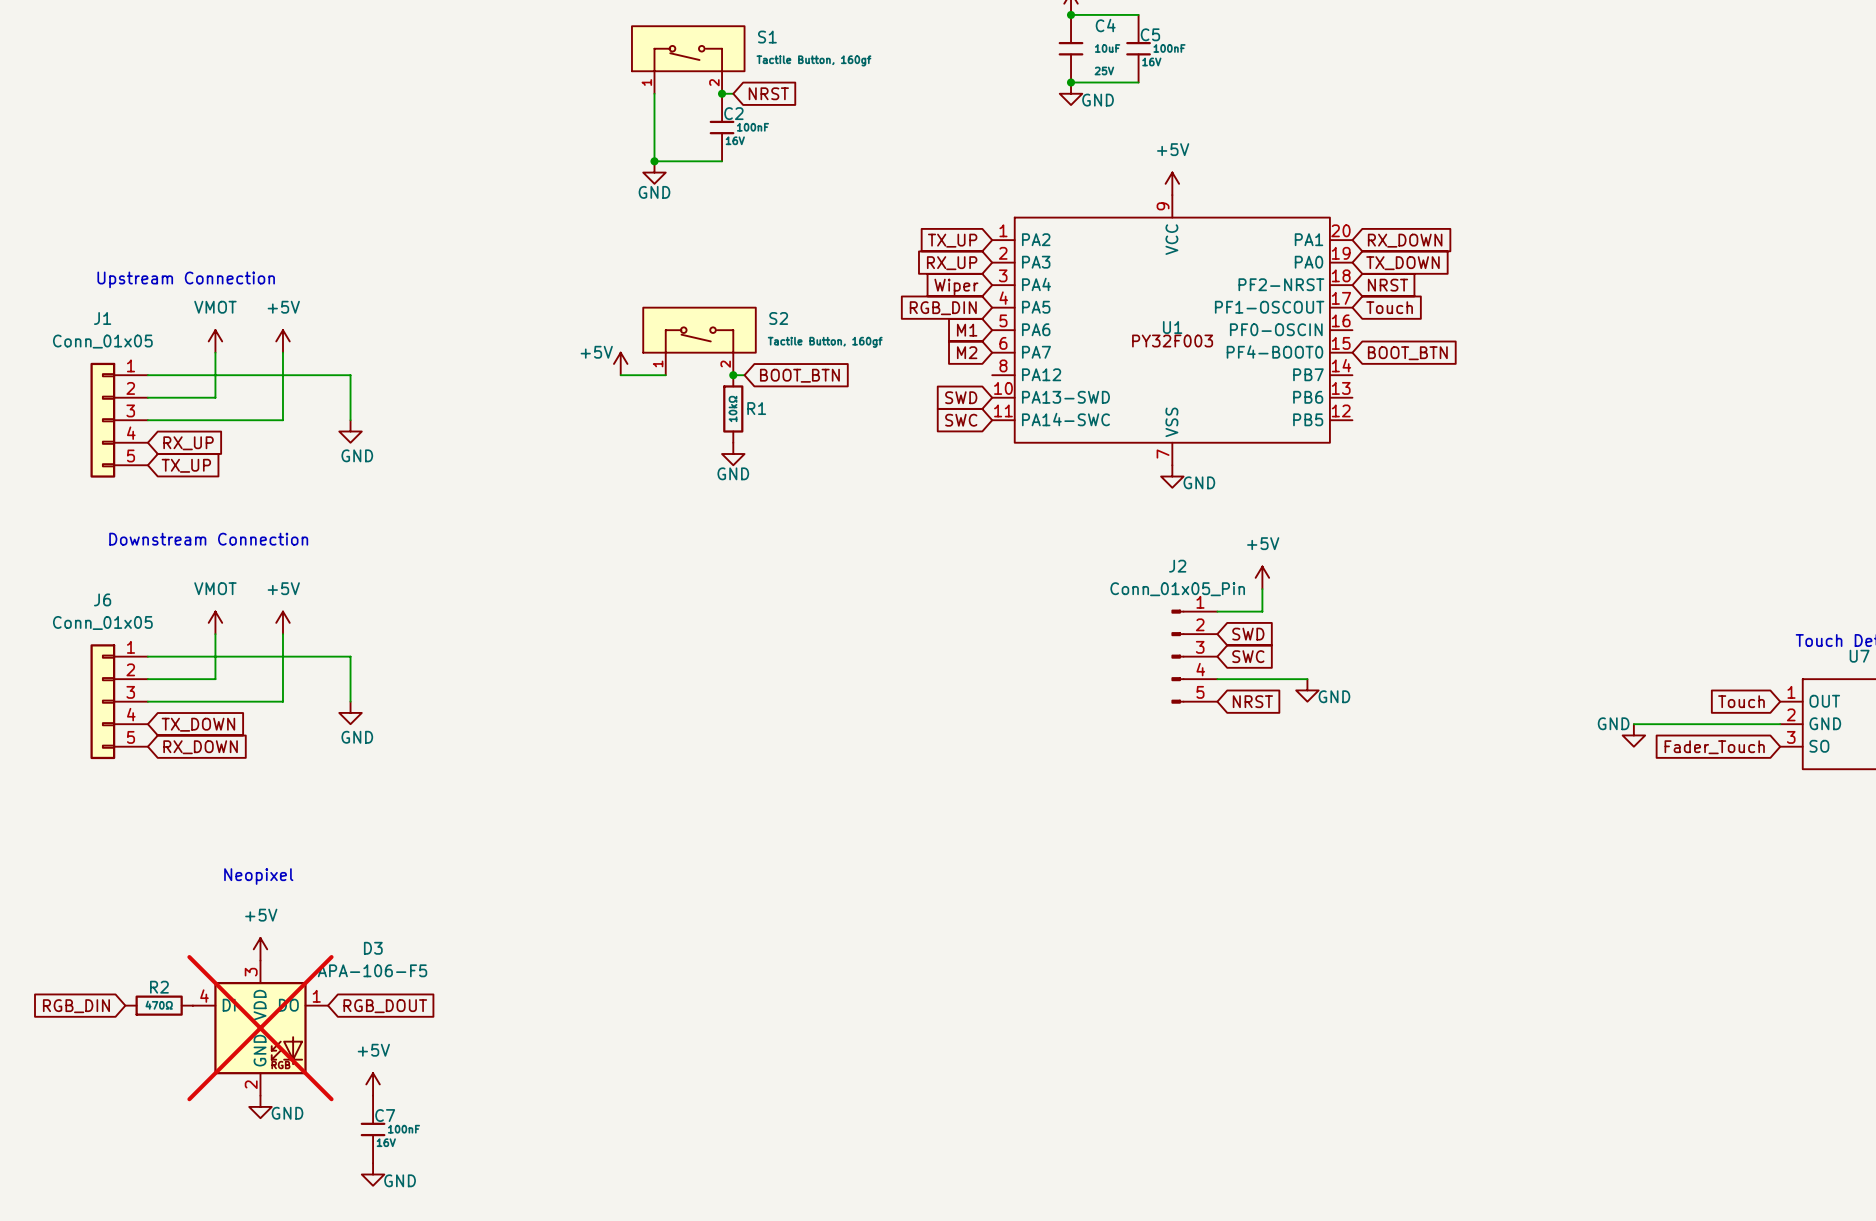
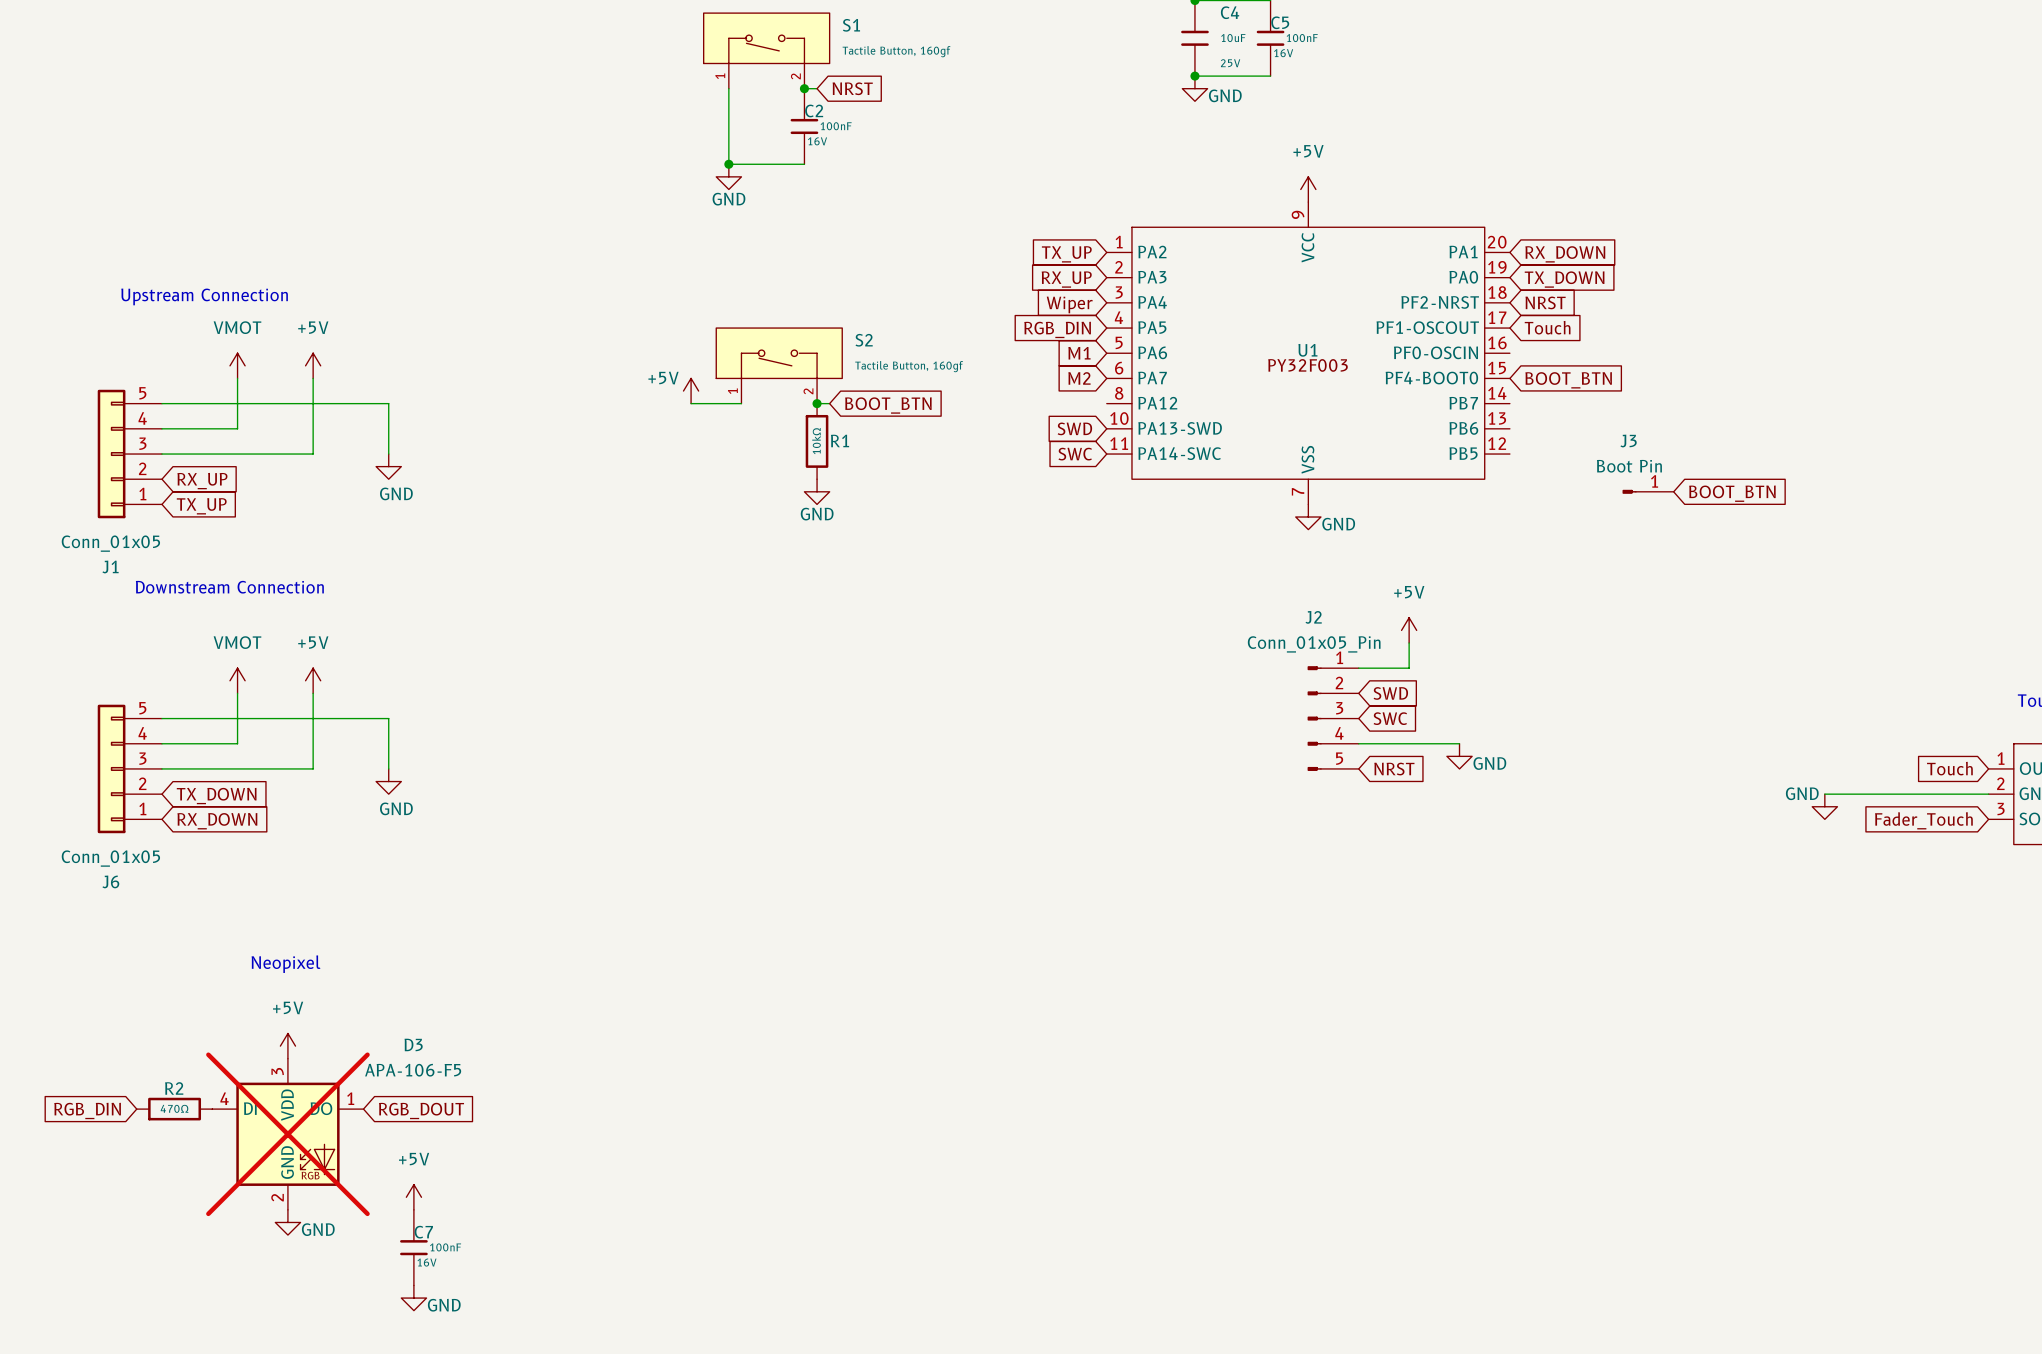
J1 flip: as is (102, 420) -> up-down (111, 454)
J3: none -> Boot Pin (1648, 491)
global label: none -> BOOT_BTN (1732, 493)
J6 flip: as is (102, 701) -> up-down (111, 768)

